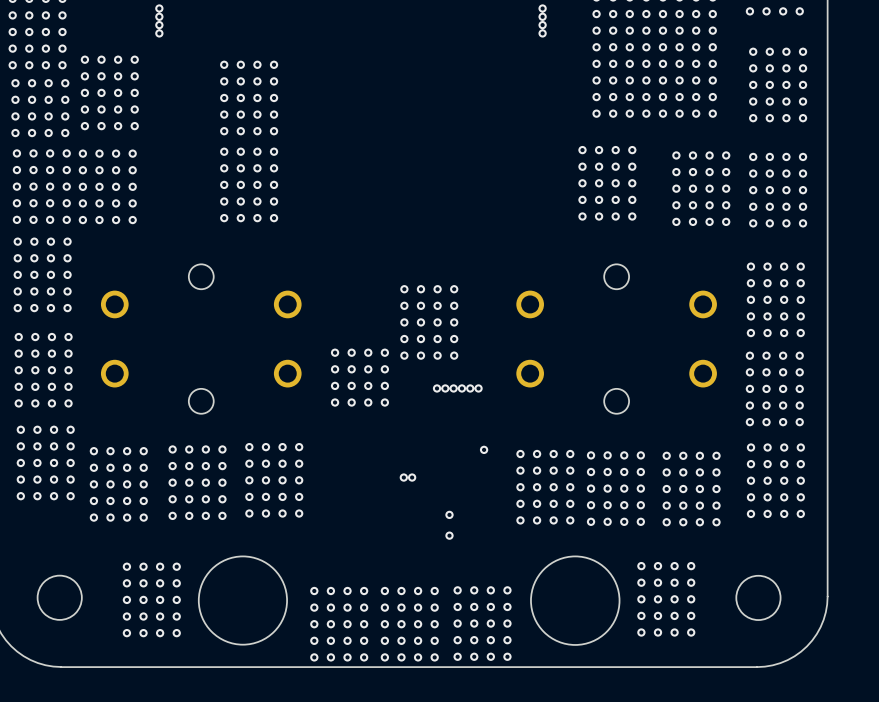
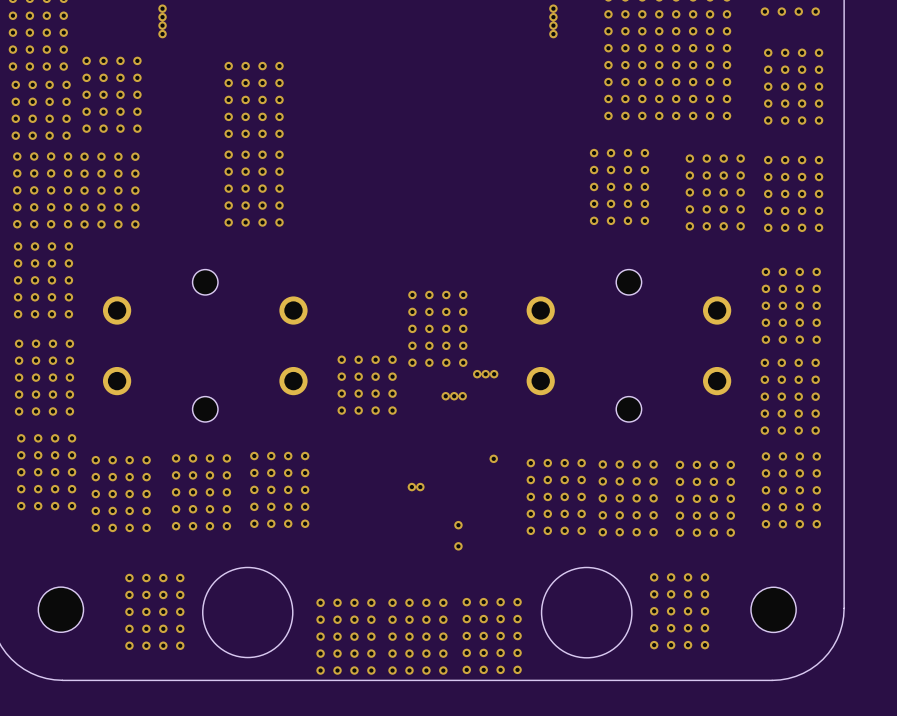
via: none -> (477, 374)
via: none -> (485, 374)
via: none -> (494, 374)
via: (461, 388) -> none
via: (470, 388) -> none
via: (478, 388) -> none

